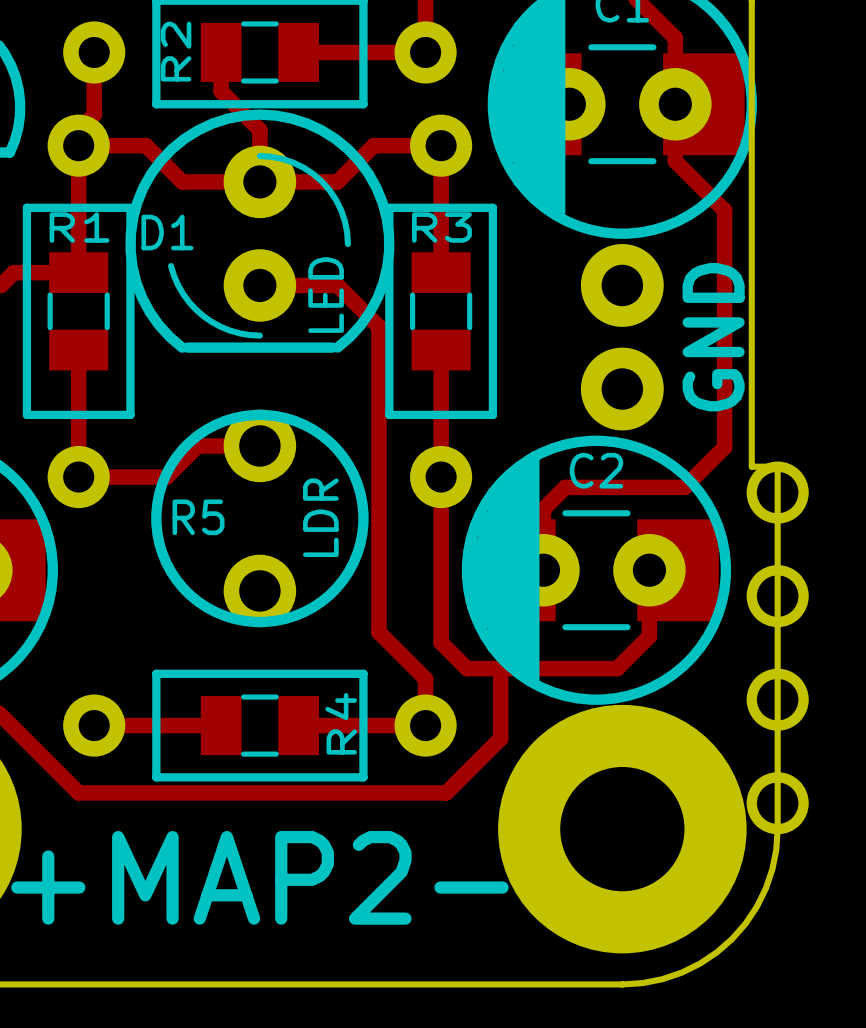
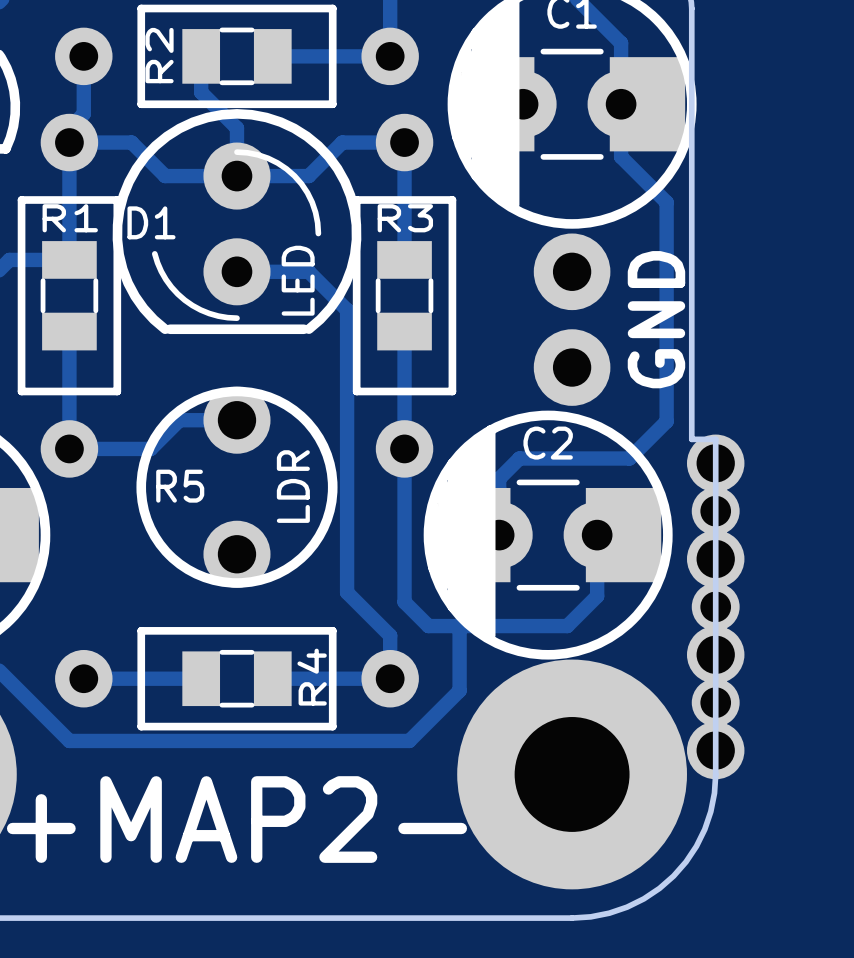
part: none -> (715, 511)
part: none -> (715, 606)
part: none -> (715, 702)

